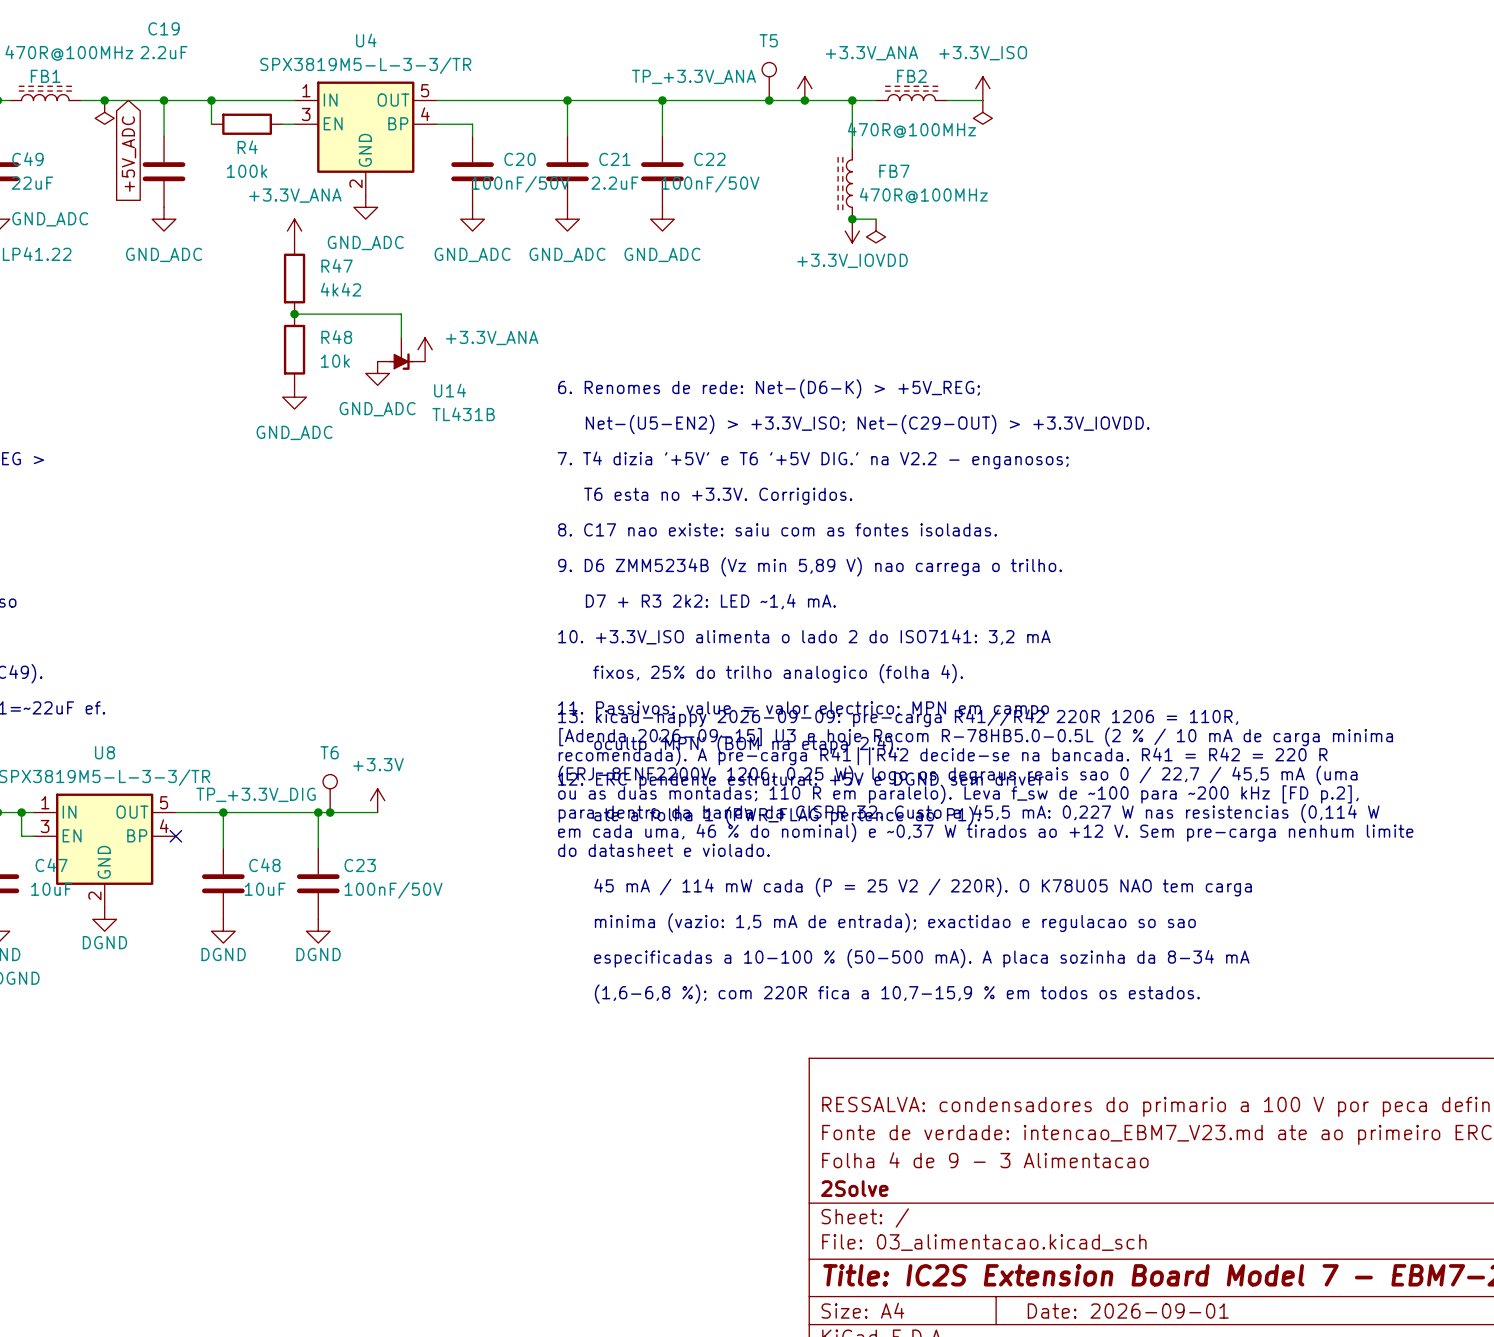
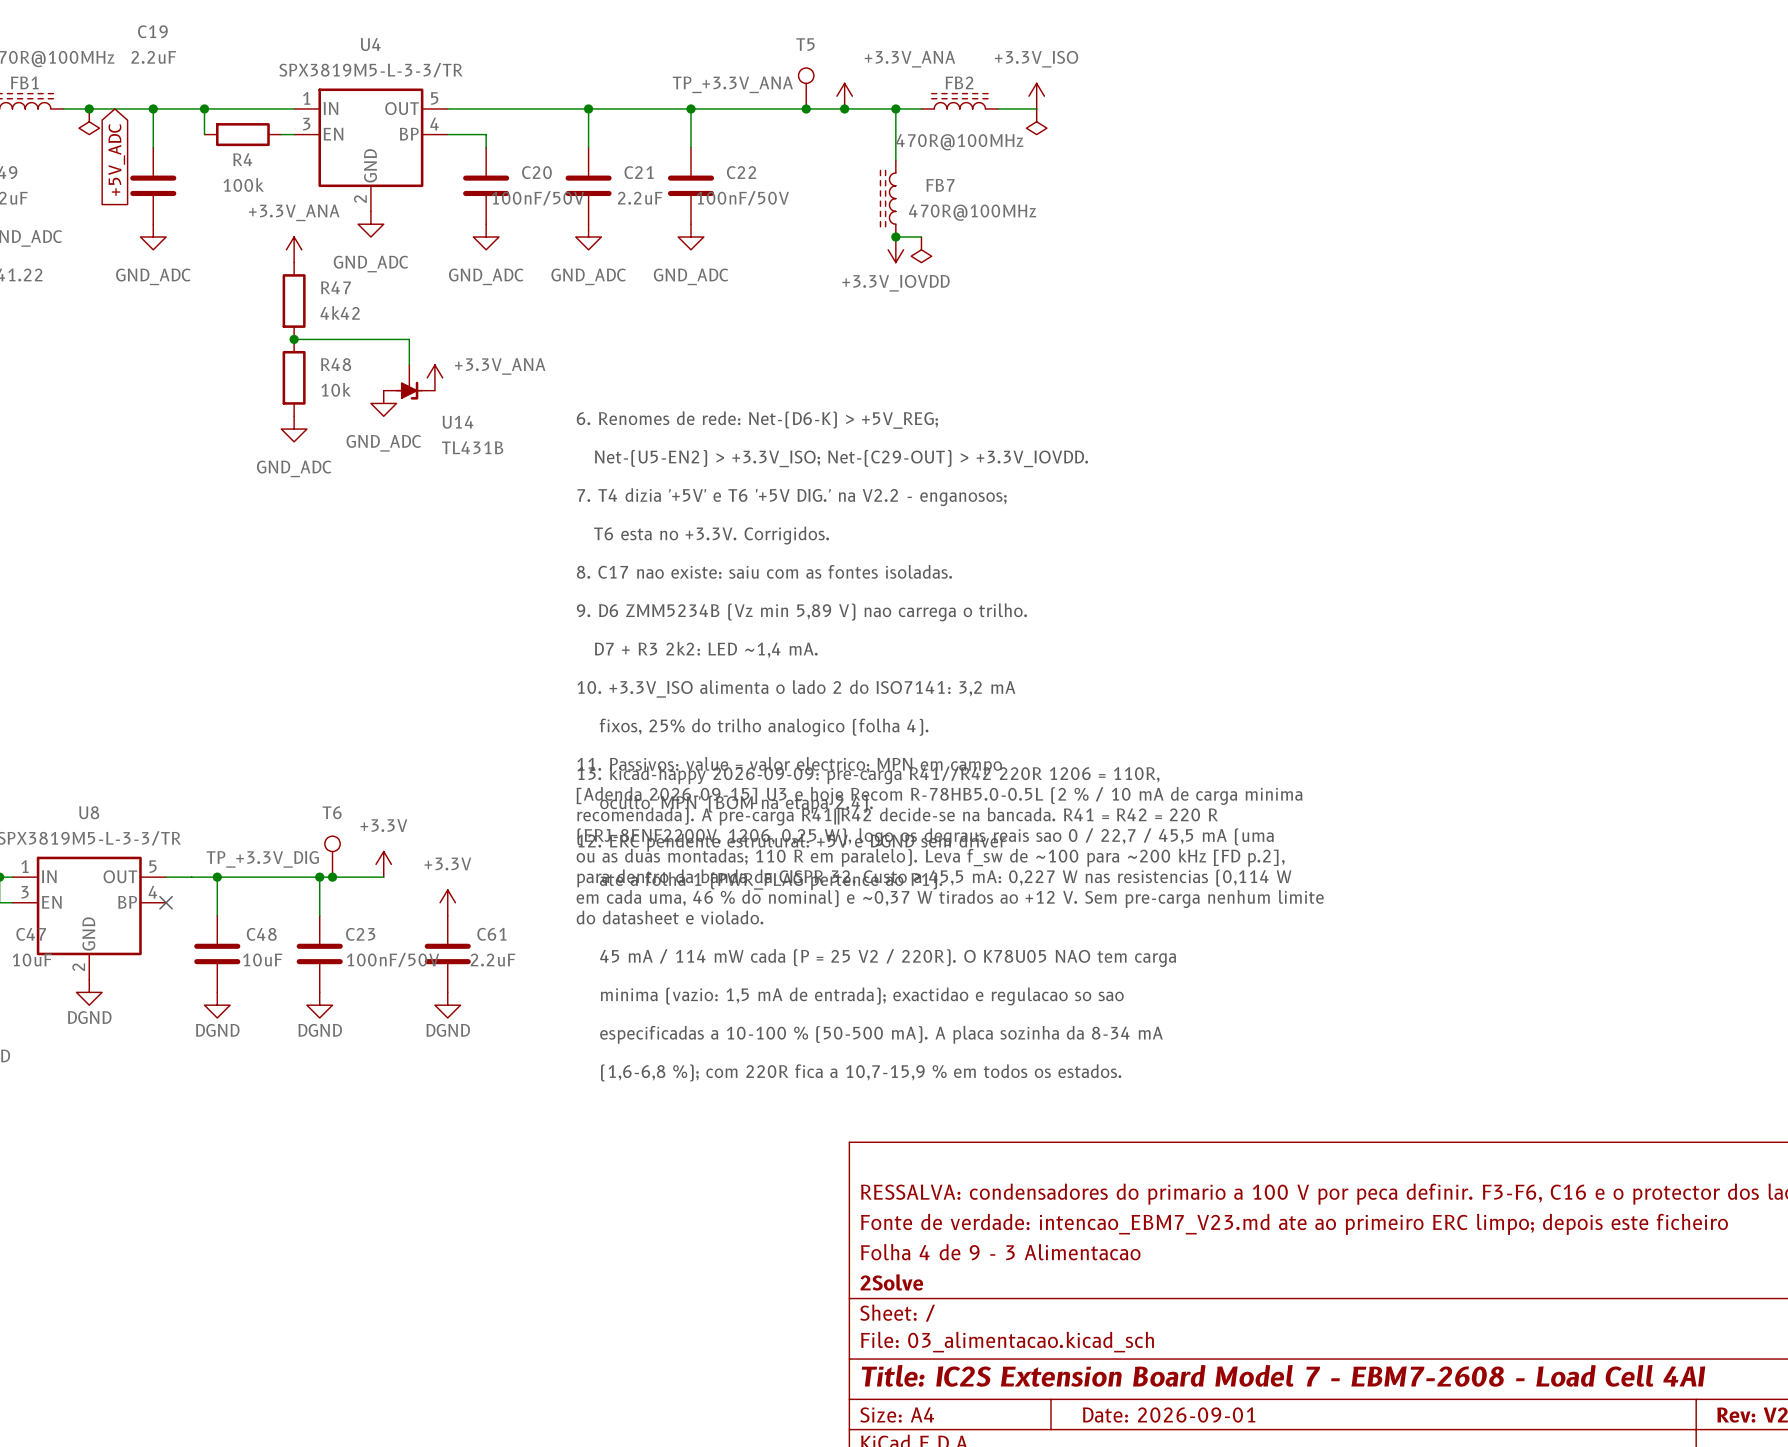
power symbol: none -> +3.3V (447, 902)
C61: none -> 2.2uF (447, 953)
power symbol: none -> DGND (447, 1005)

